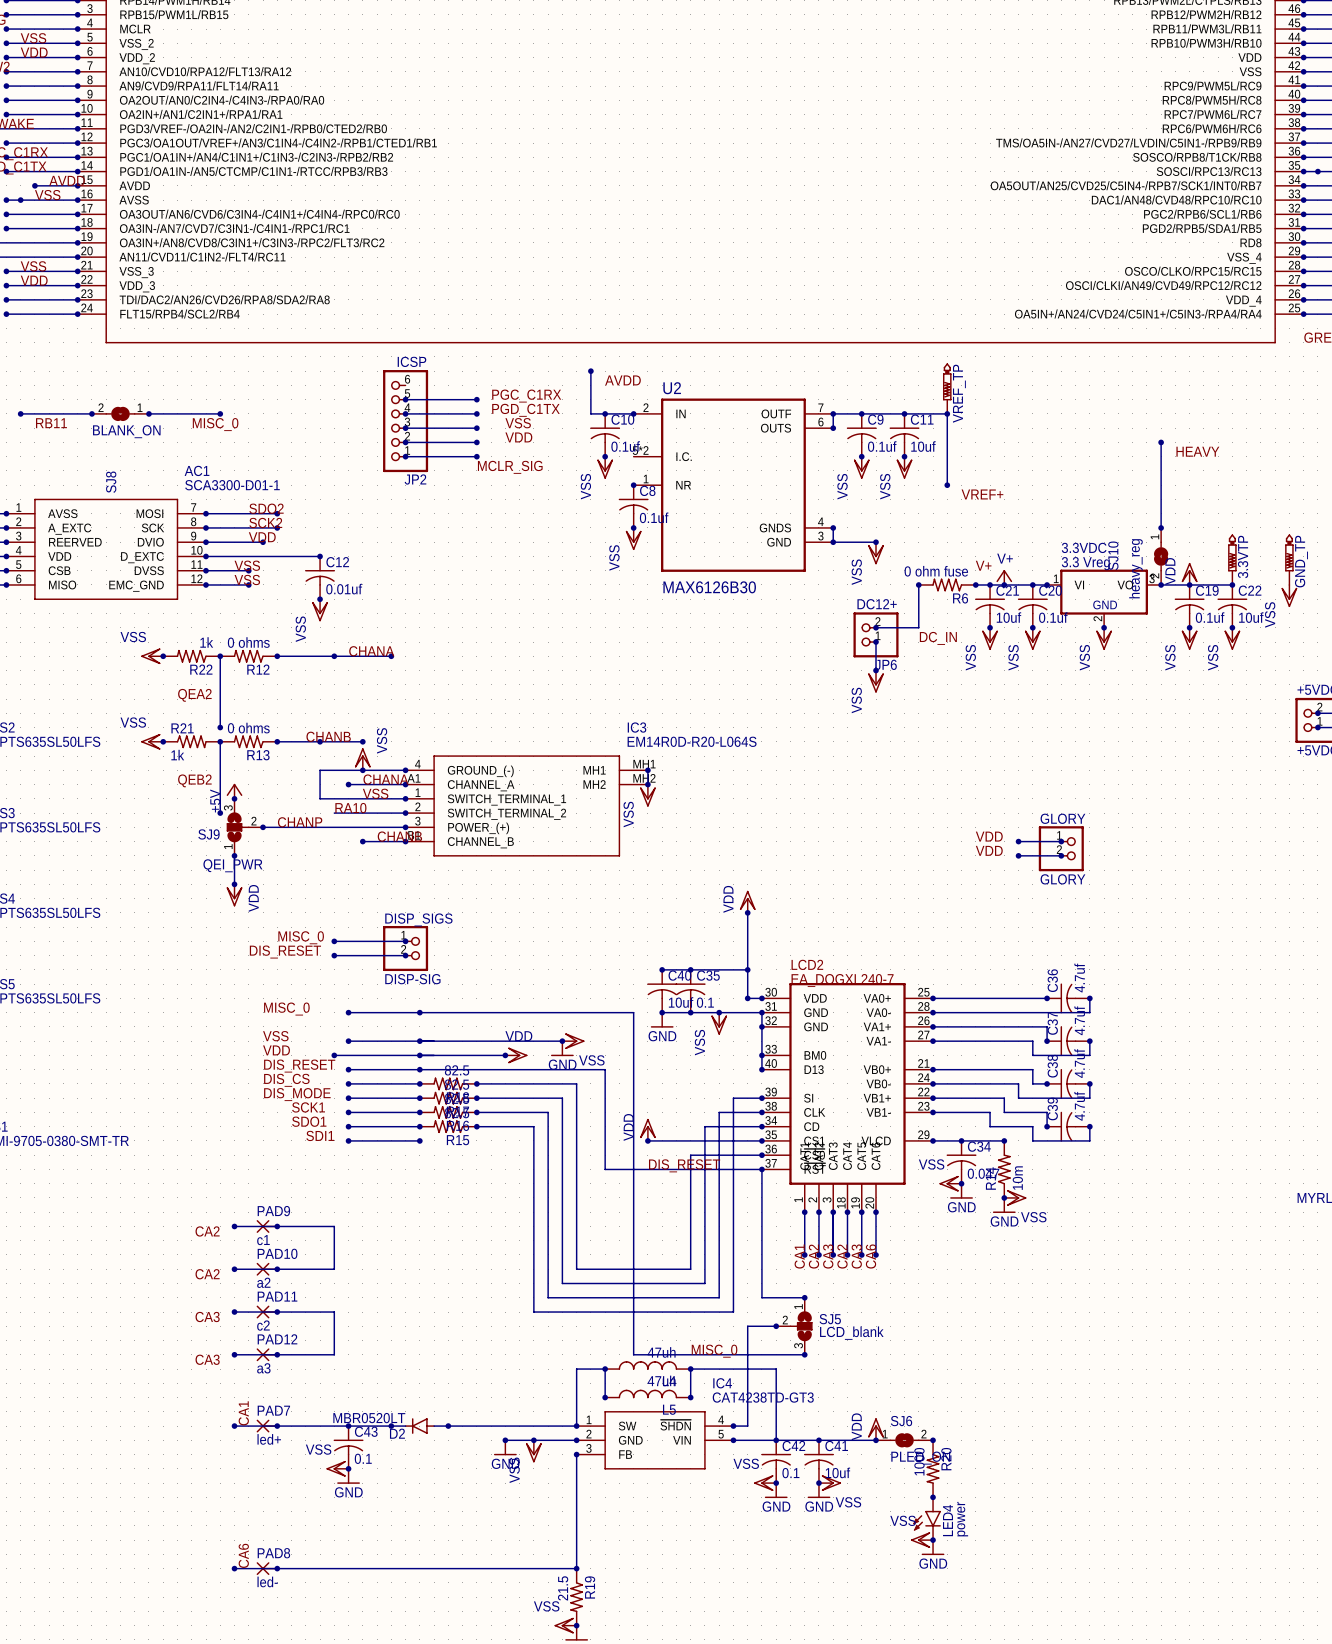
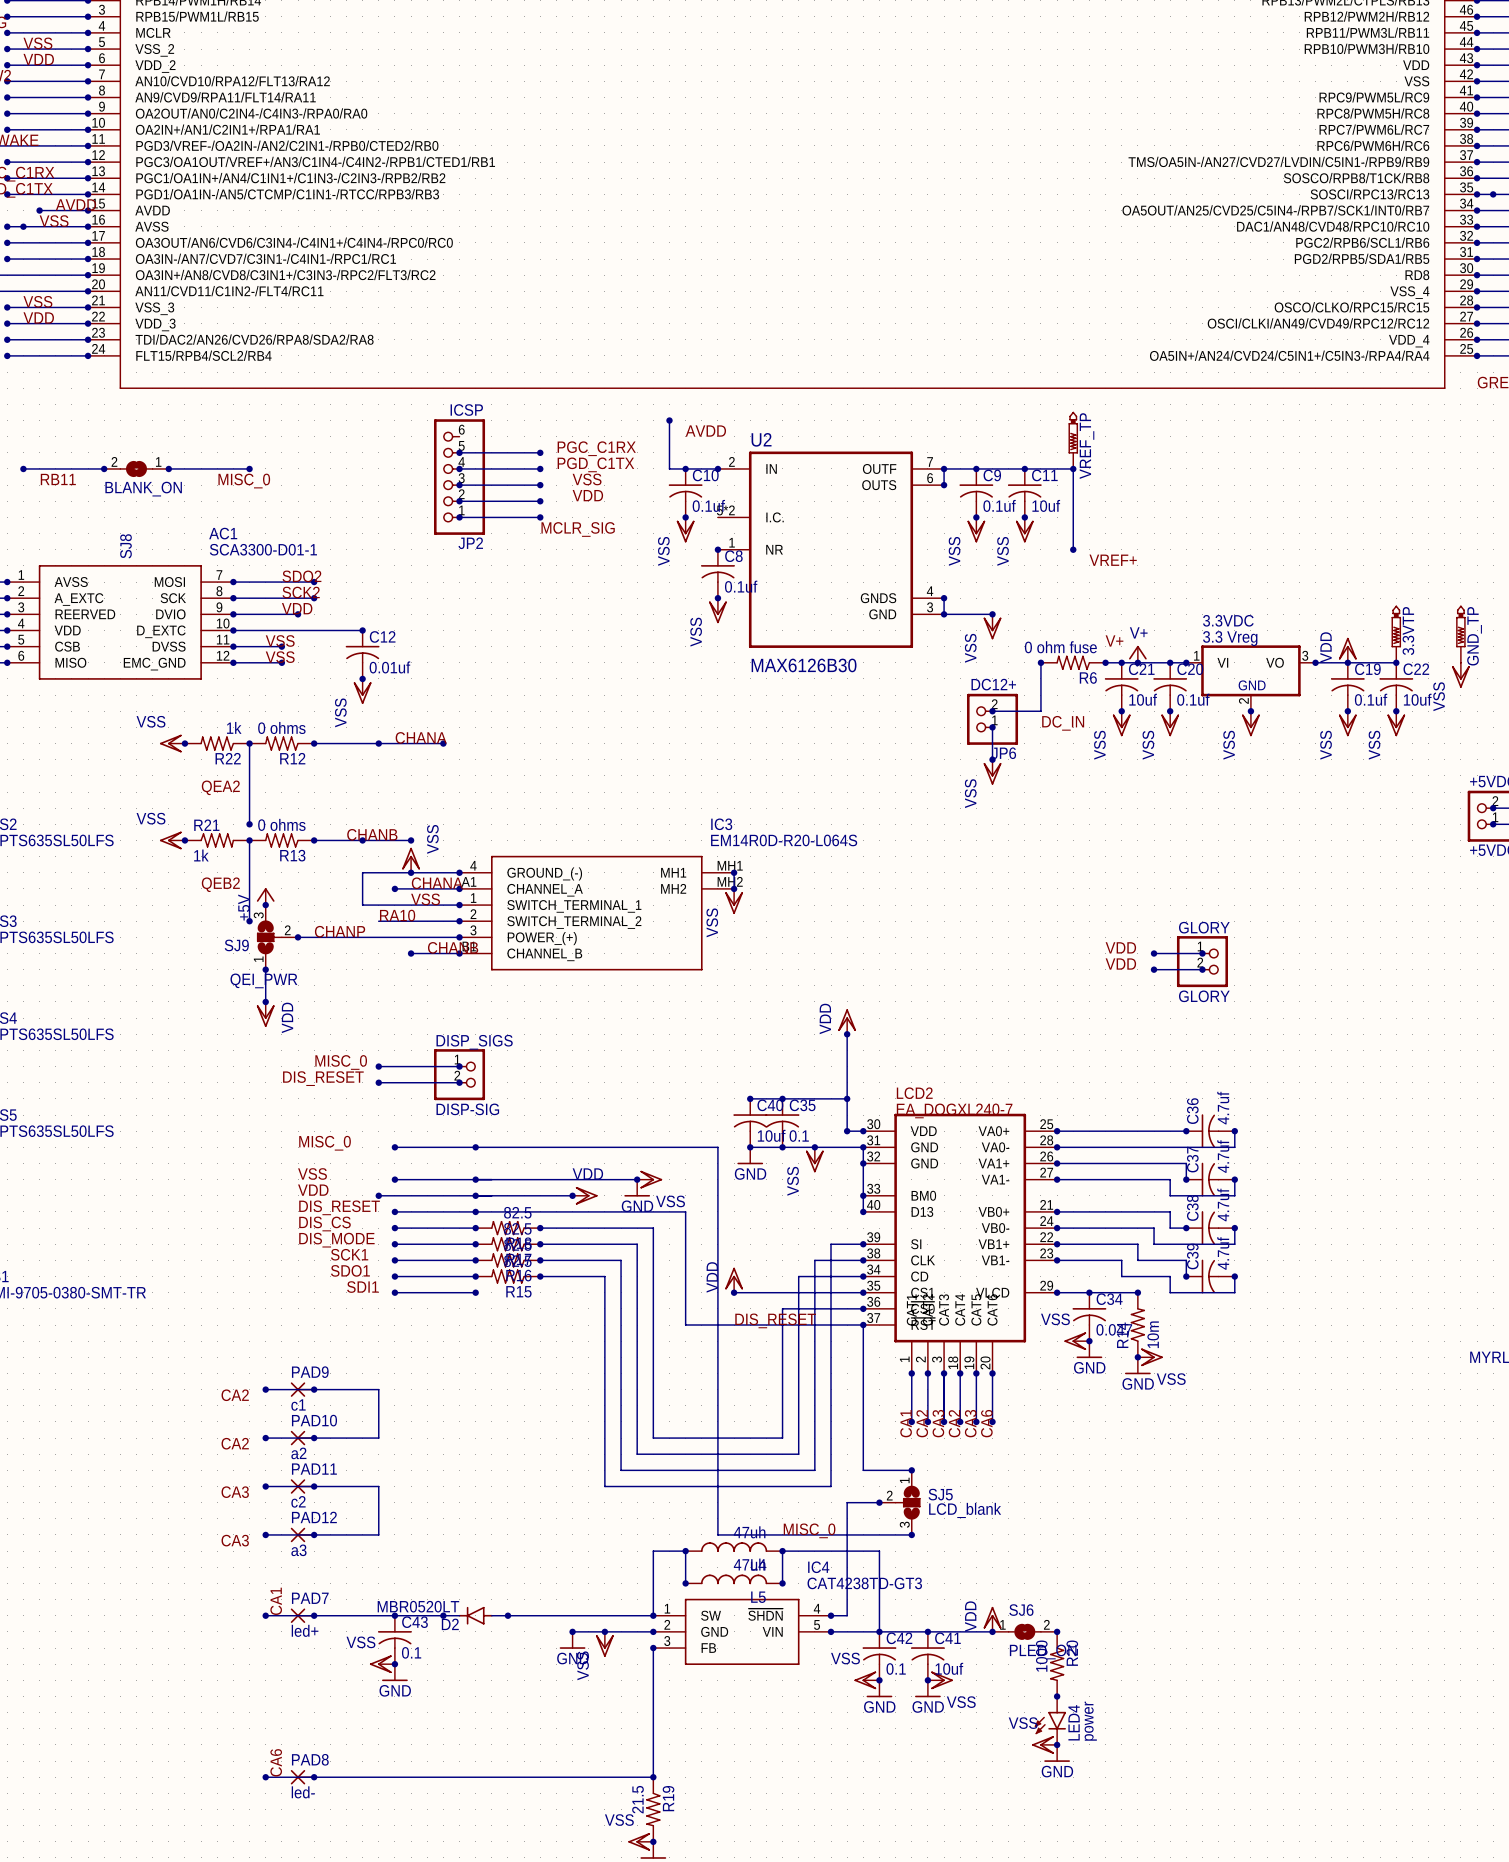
wire: (1161, 442) (1161, 527) -> none
junction: (1161, 442) -> none
label: HEAVY (1197, 451) -> none
junction: (1161, 527) -> none
SJ10: heavy_reg (1161, 556) -> none

